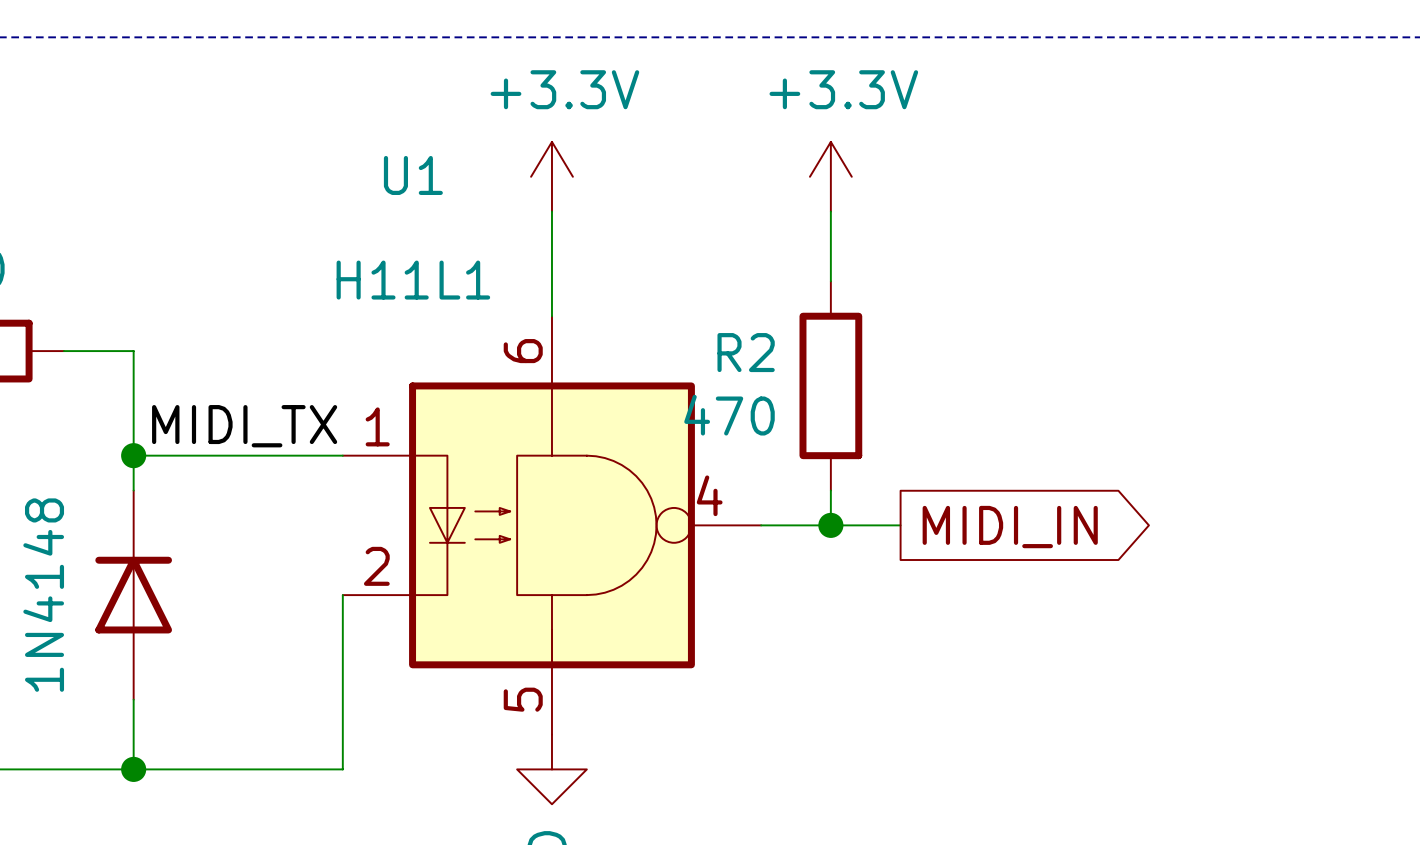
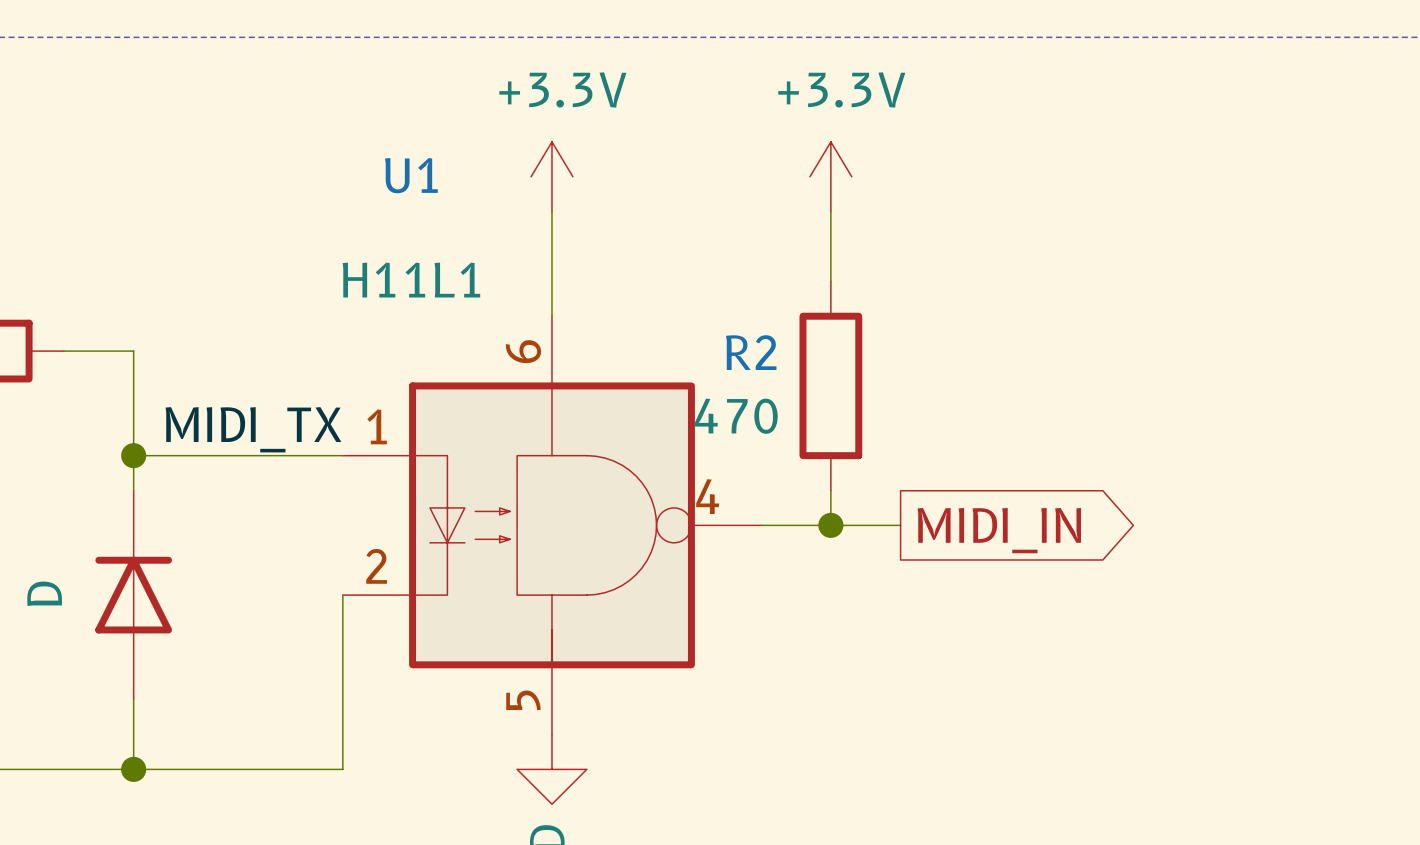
part value: 1N4148 (43, 595) -> D (44, 593)

